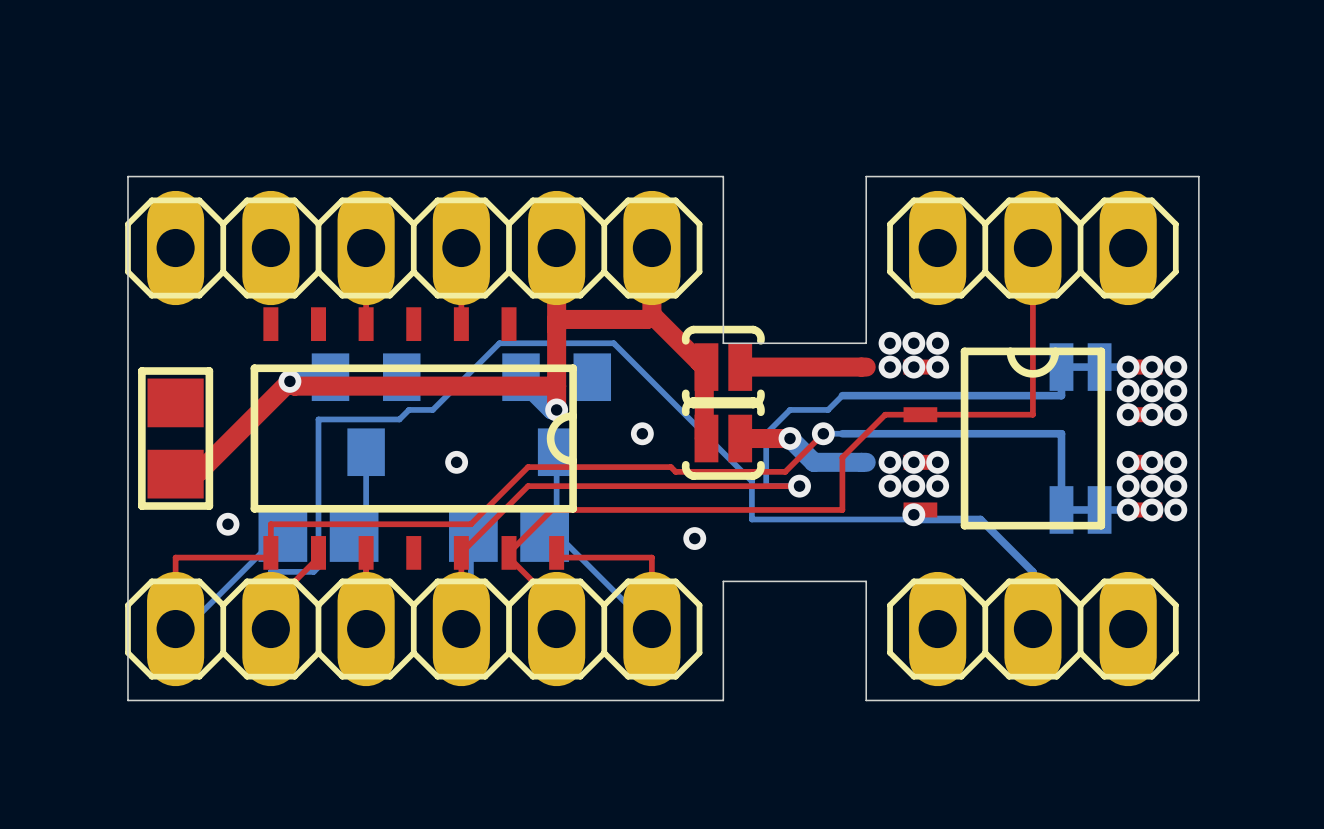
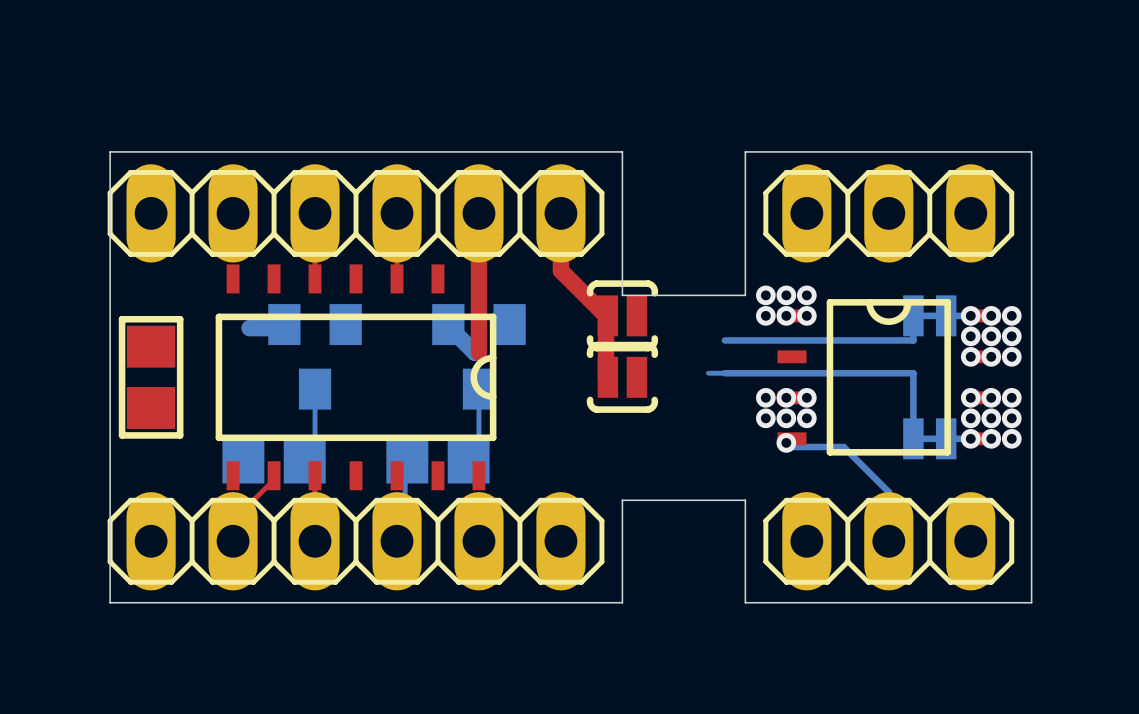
top track: (1032, 248) (1032, 414) (885, 414) (842, 457) (842, 509) (551, 509) (509, 552) (509, 557) (556, 605) (556, 629) -> none
top track: (651, 314) (647, 319) (561, 319) (556, 324) -> none
top track: (740, 367) (866, 367) -> none
via: (289, 381) -> none
top track: (556, 386) (294, 386) (289, 381) (199, 471) (175, 471) (175, 474) -> none
bottom track: (842, 395) (828, 409) (790, 409) (766, 433) (766, 486) (799, 486) -> none
via: (556, 409) -> none
via: (642, 433) -> none
top track: (823, 433) (785, 471) (675, 471) (670, 467) (528, 467) (470, 524) (270, 524) (270, 557) (175, 557) (175, 629) -> none
via: (823, 433) -> none
top track: (740, 438) (790, 438) -> none
bottom track: (790, 438) (813, 462) (866, 462) -> none
via: (790, 438) -> none
via: (456, 462) -> none
top track: (799, 486) (528, 486) (461, 552) (461, 629) -> none
via: (799, 486) -> none
bottom track: (913, 514) (913, 519) (751, 519) (751, 481) (613, 343) (499, 343) (432, 409) (408, 409) (399, 419) (318, 419) (318, 567) (313, 571) (270, 571) (270, 629) -> none
via: (228, 524) -> none
bottom track: (282, 533) (280, 533) (185, 629) (175, 629) -> none
bottom track: (544, 533) (556, 533) (651, 629) -> none
via: (694, 538) -> none
top track: (556, 552) (556, 557) (651, 557) (651, 629) -> none

